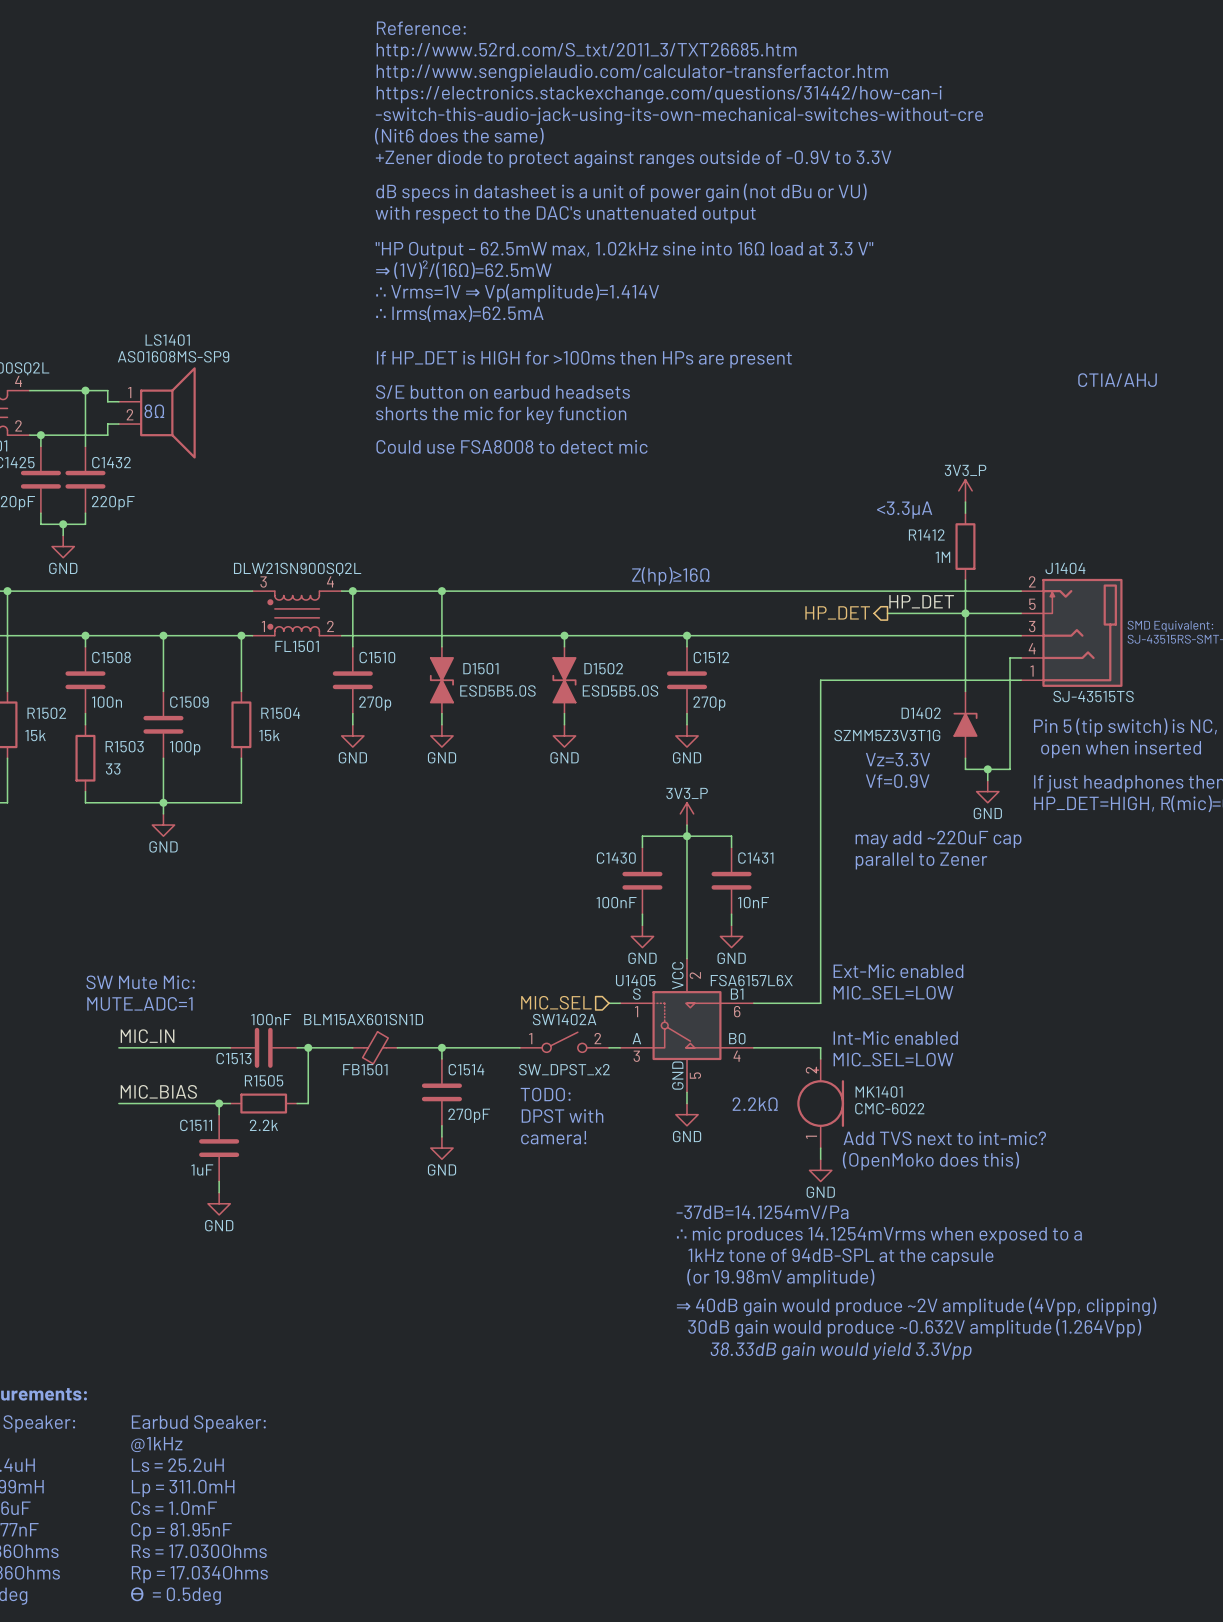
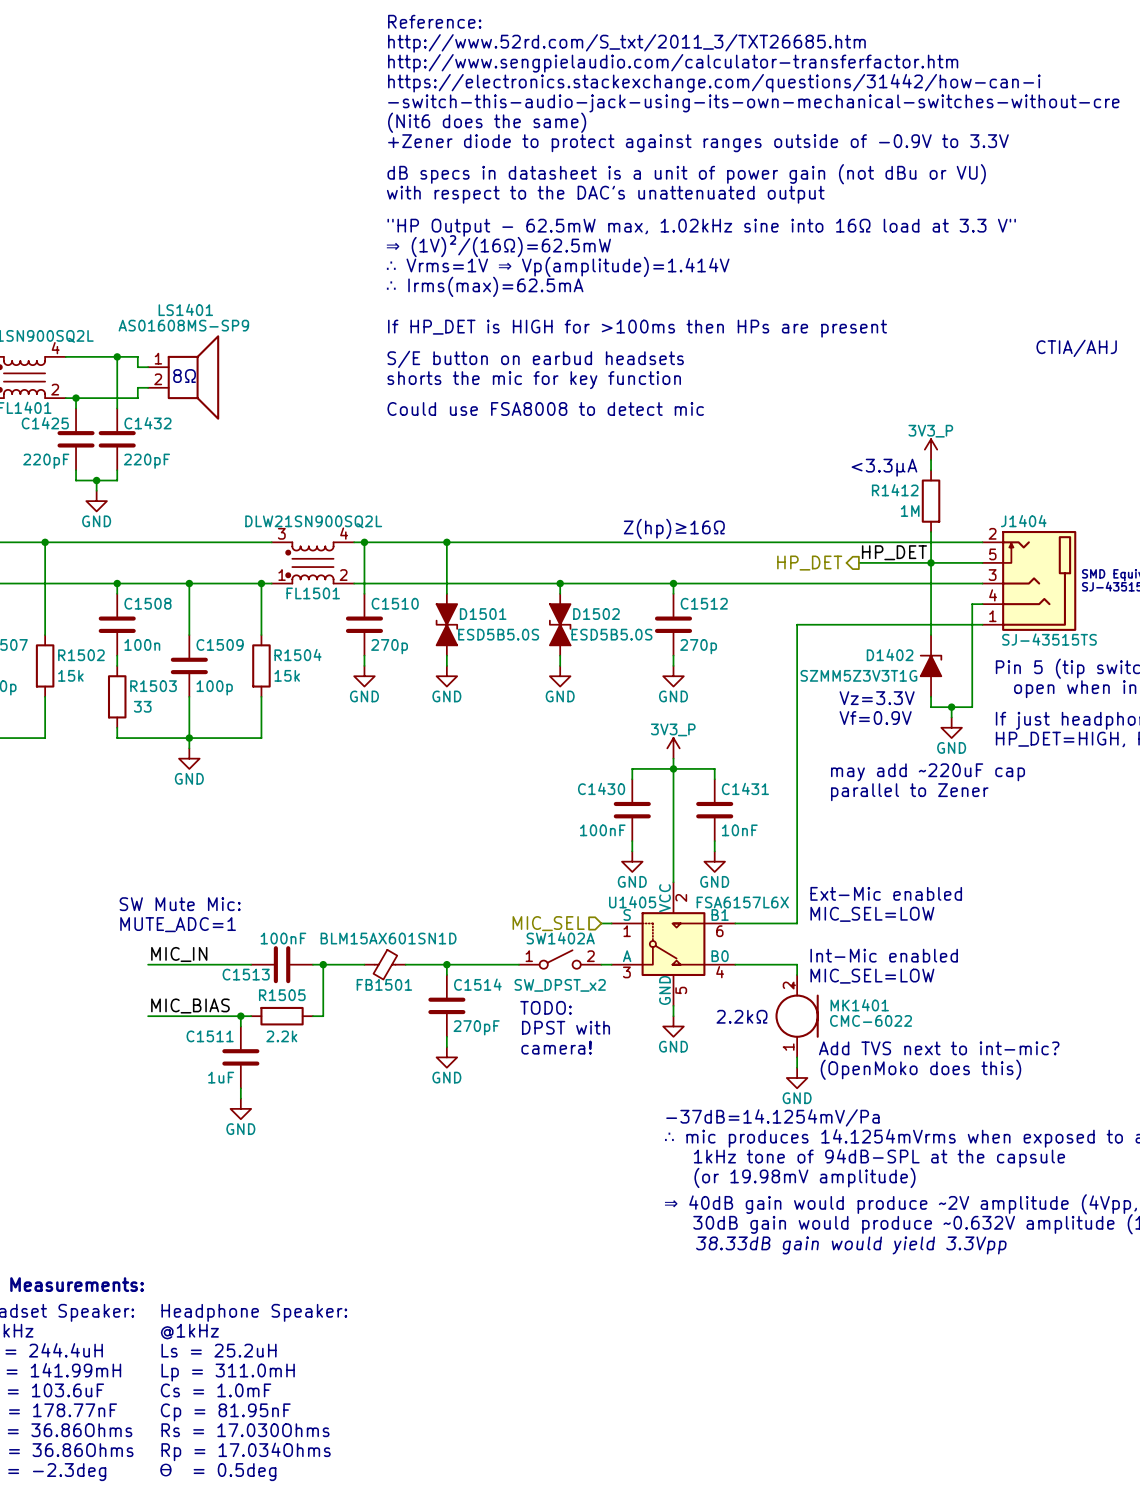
text: Earbud Speaker: (198, 1423) -> Headphone Speaker: (254, 1312)

